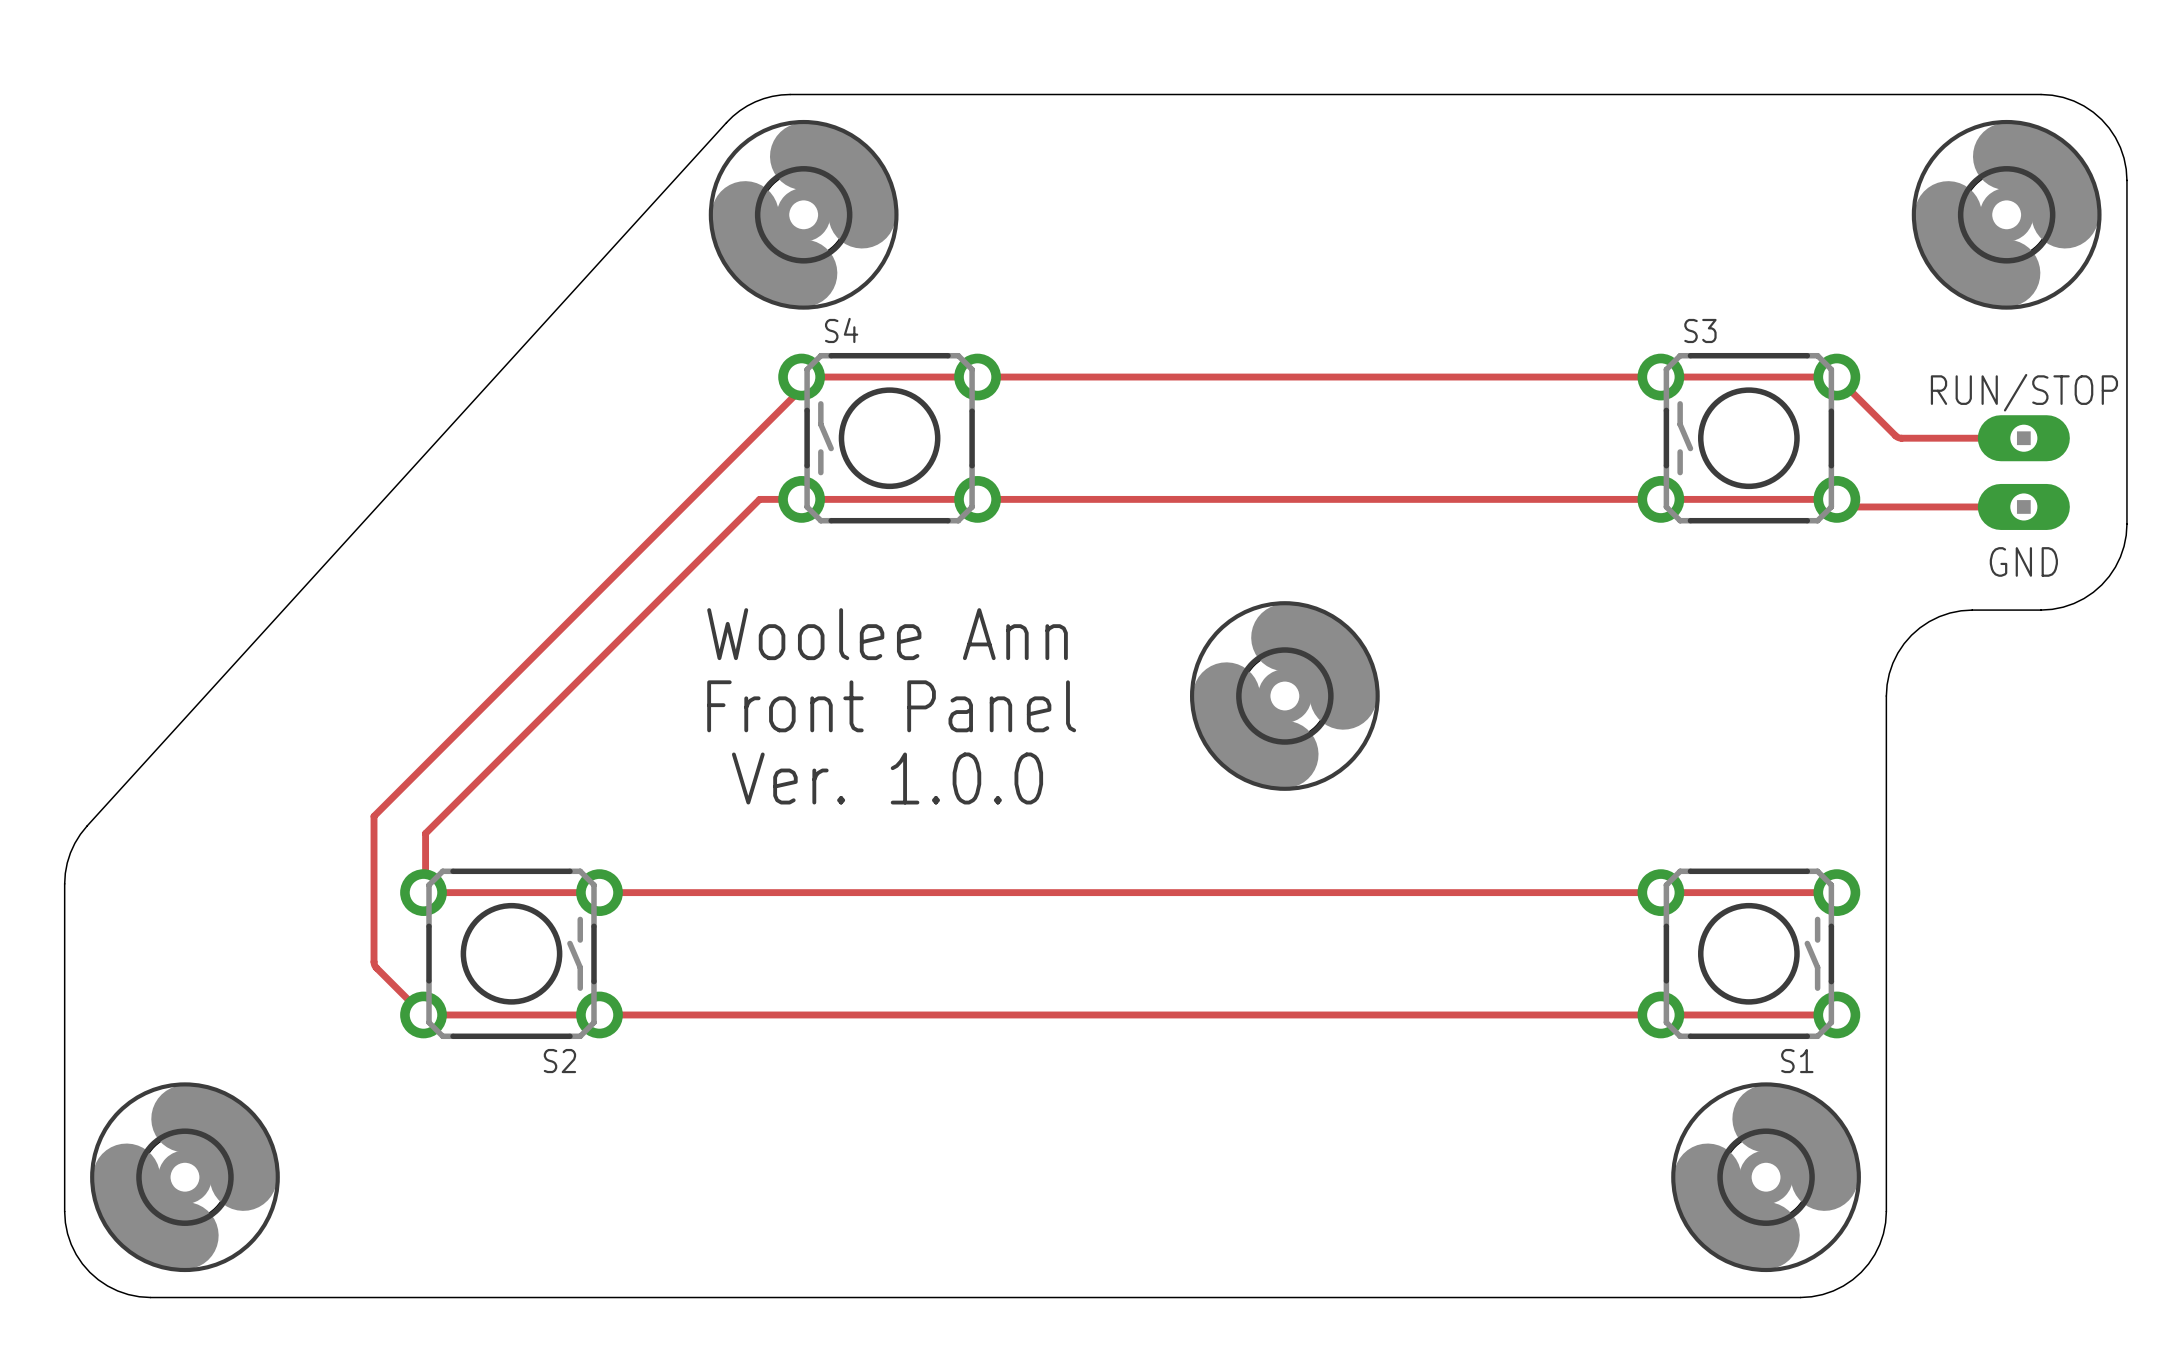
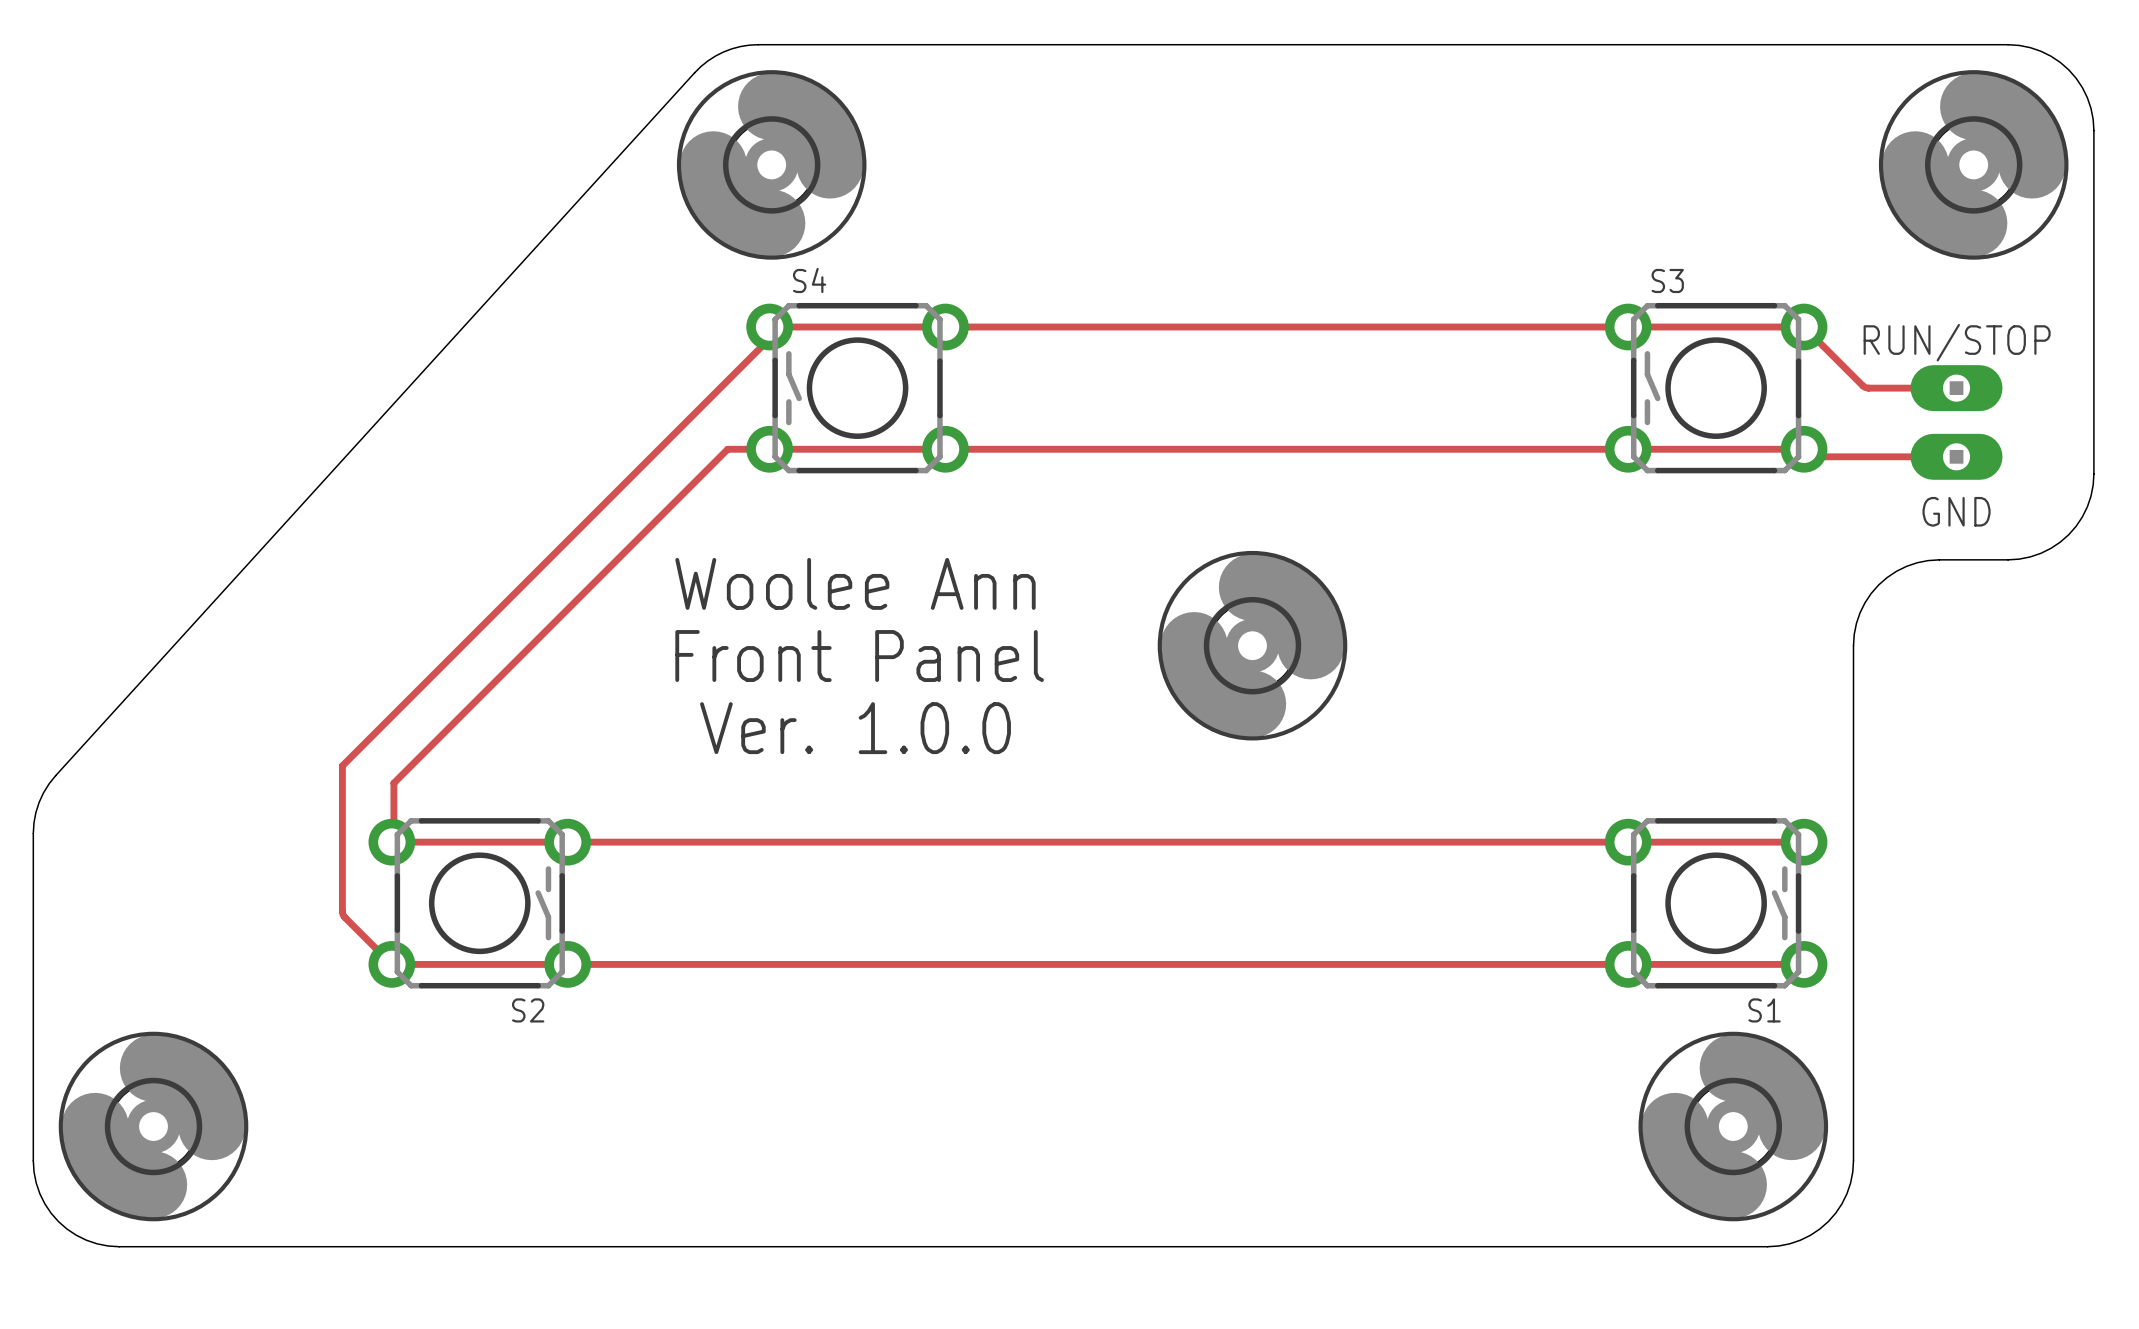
text position: RUN/STOP (2024, 392) -> RUN/STOP (1957, 342)
part position: (2023, 472) -> (1956, 422)
text position: GND (2023, 561) -> GND (1956, 511)

